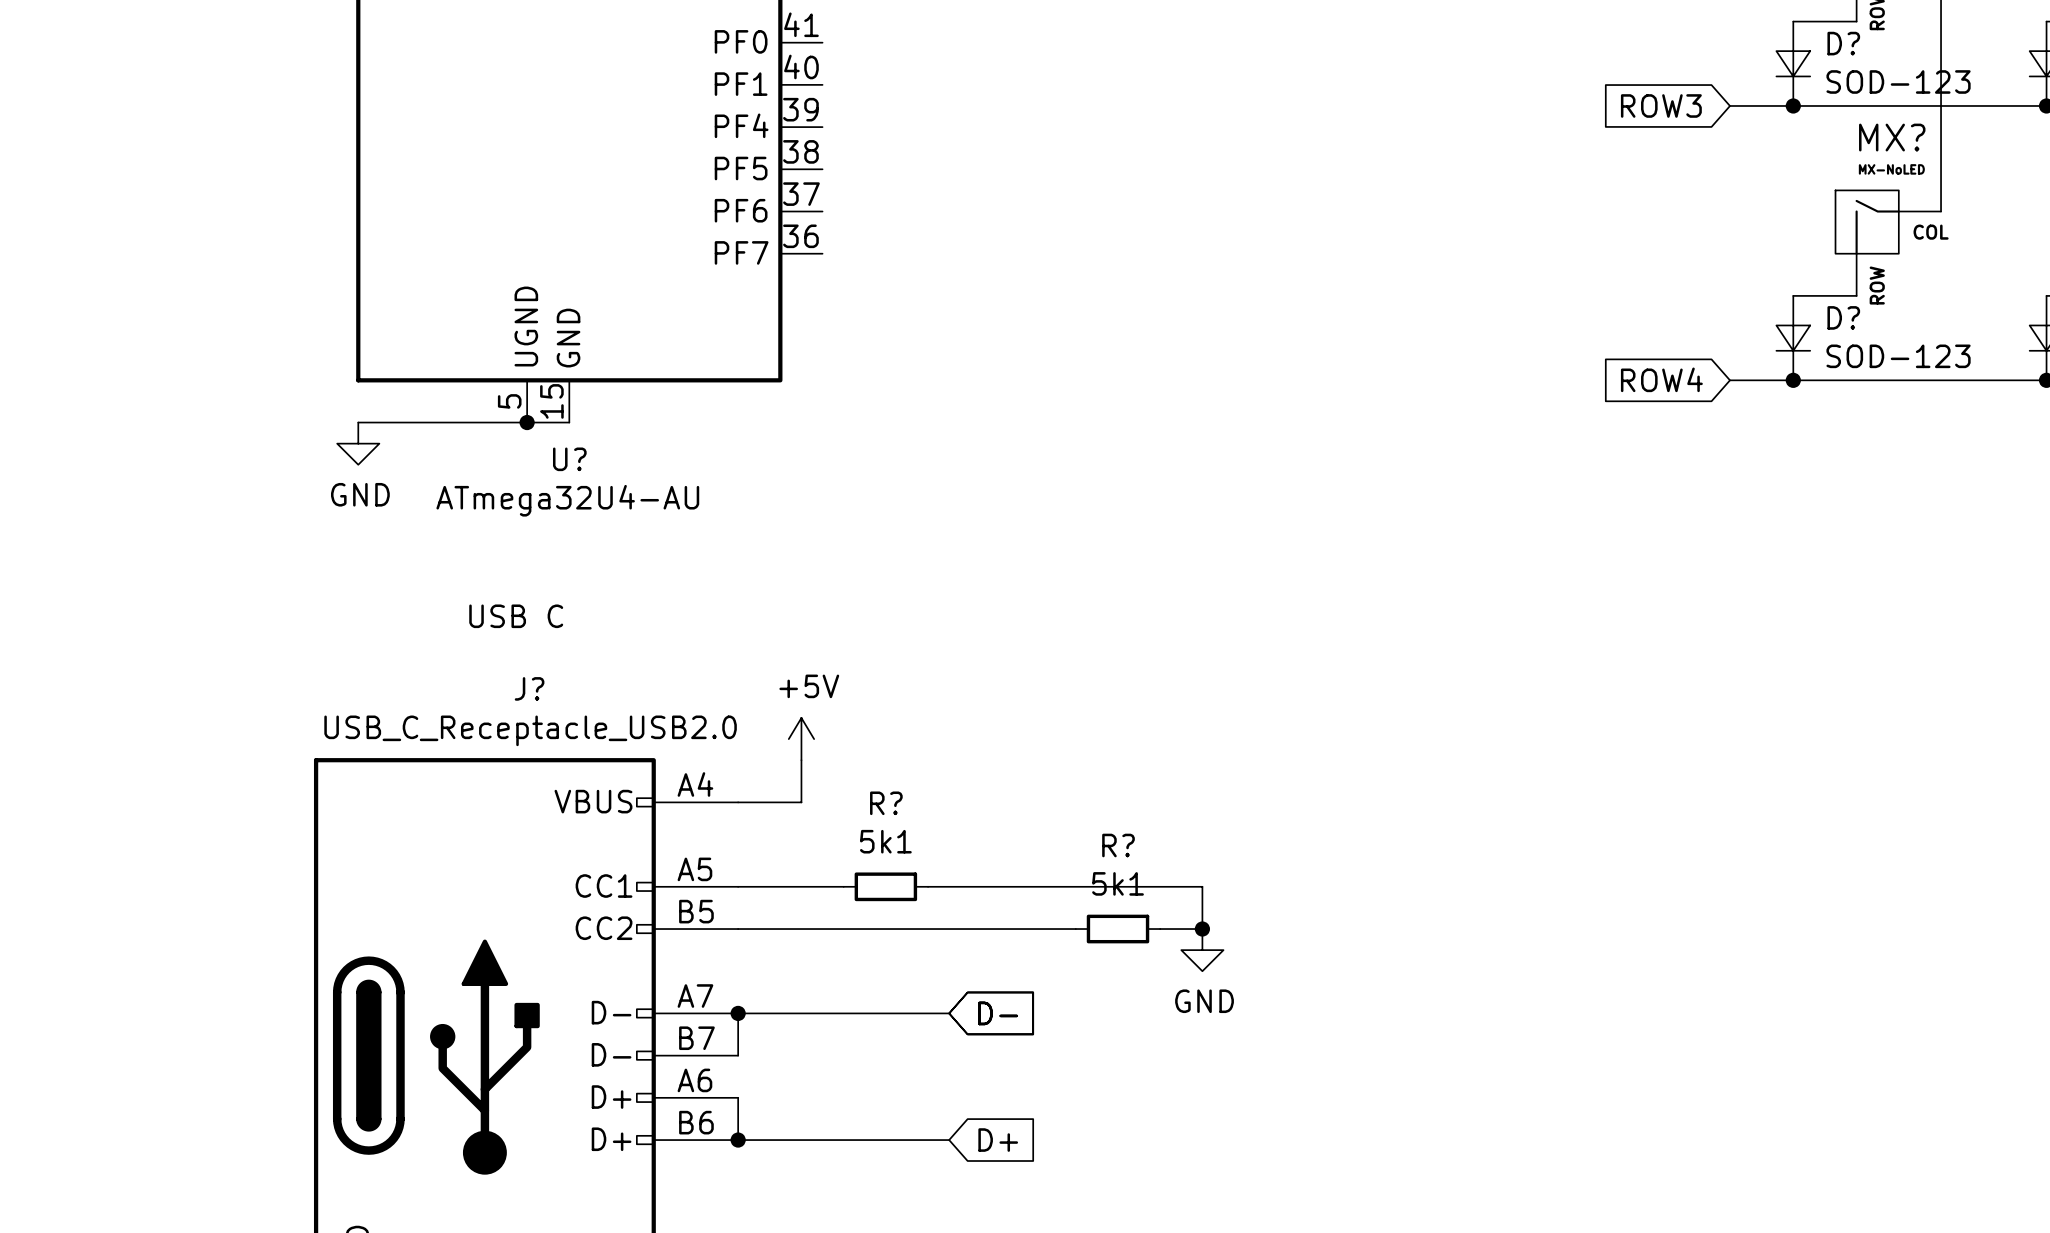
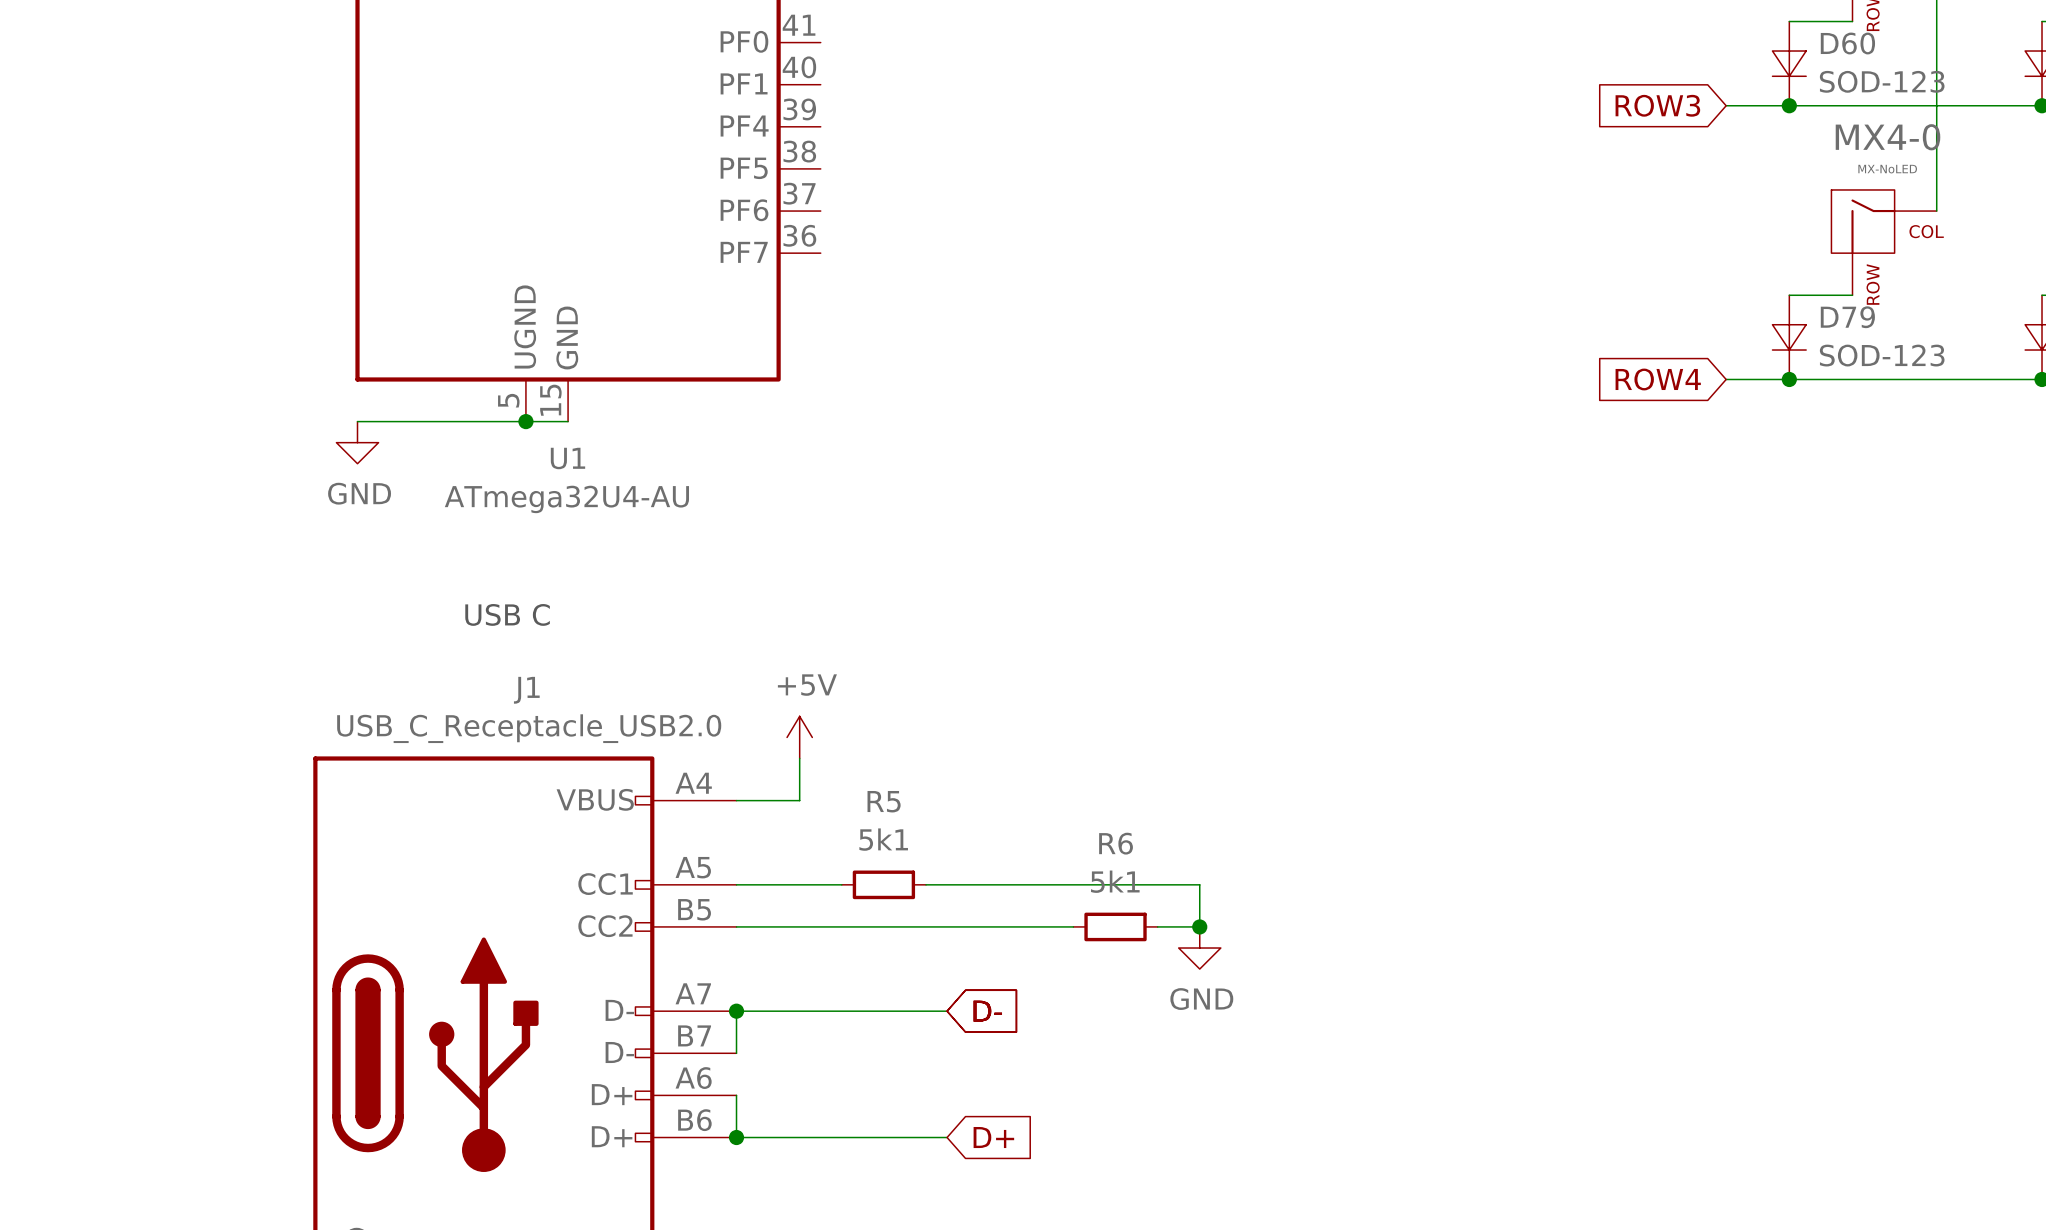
D? name: D? (1843, 43) -> D60 (1847, 43)
MX? name: MX? (1892, 137) -> MX4-0 (1888, 137)
D? name: D? (1843, 317) -> D79 (1847, 317)
U? name: U? (569, 459) -> U1 (567, 458)
J? name: J? (529, 688) -> J1 (526, 690)
R? name: R? (886, 803) -> R5 (884, 801)
R? name: R? (1118, 845) -> R6 (1116, 843)

